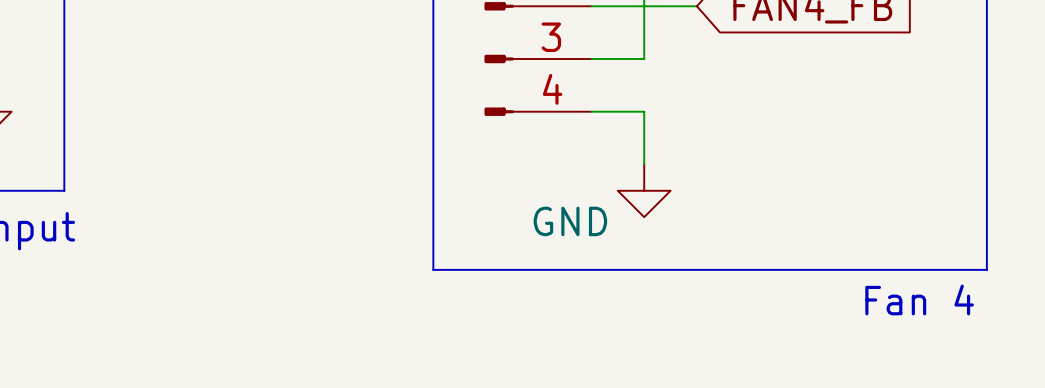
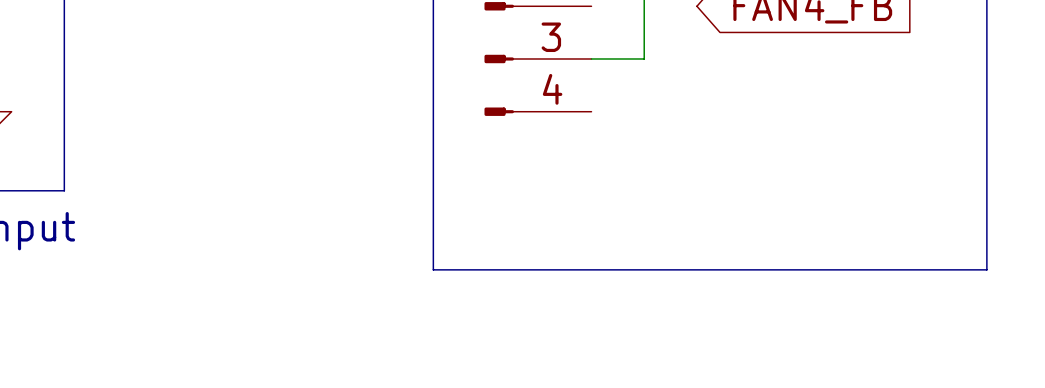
wire: (591, 6) (696, 6) -> none
wire: (591, 111) (644, 111) (644, 164) -> none
power symbol: GND (644, 190) -> none
text: Fan 4 (919, 299) -> none

